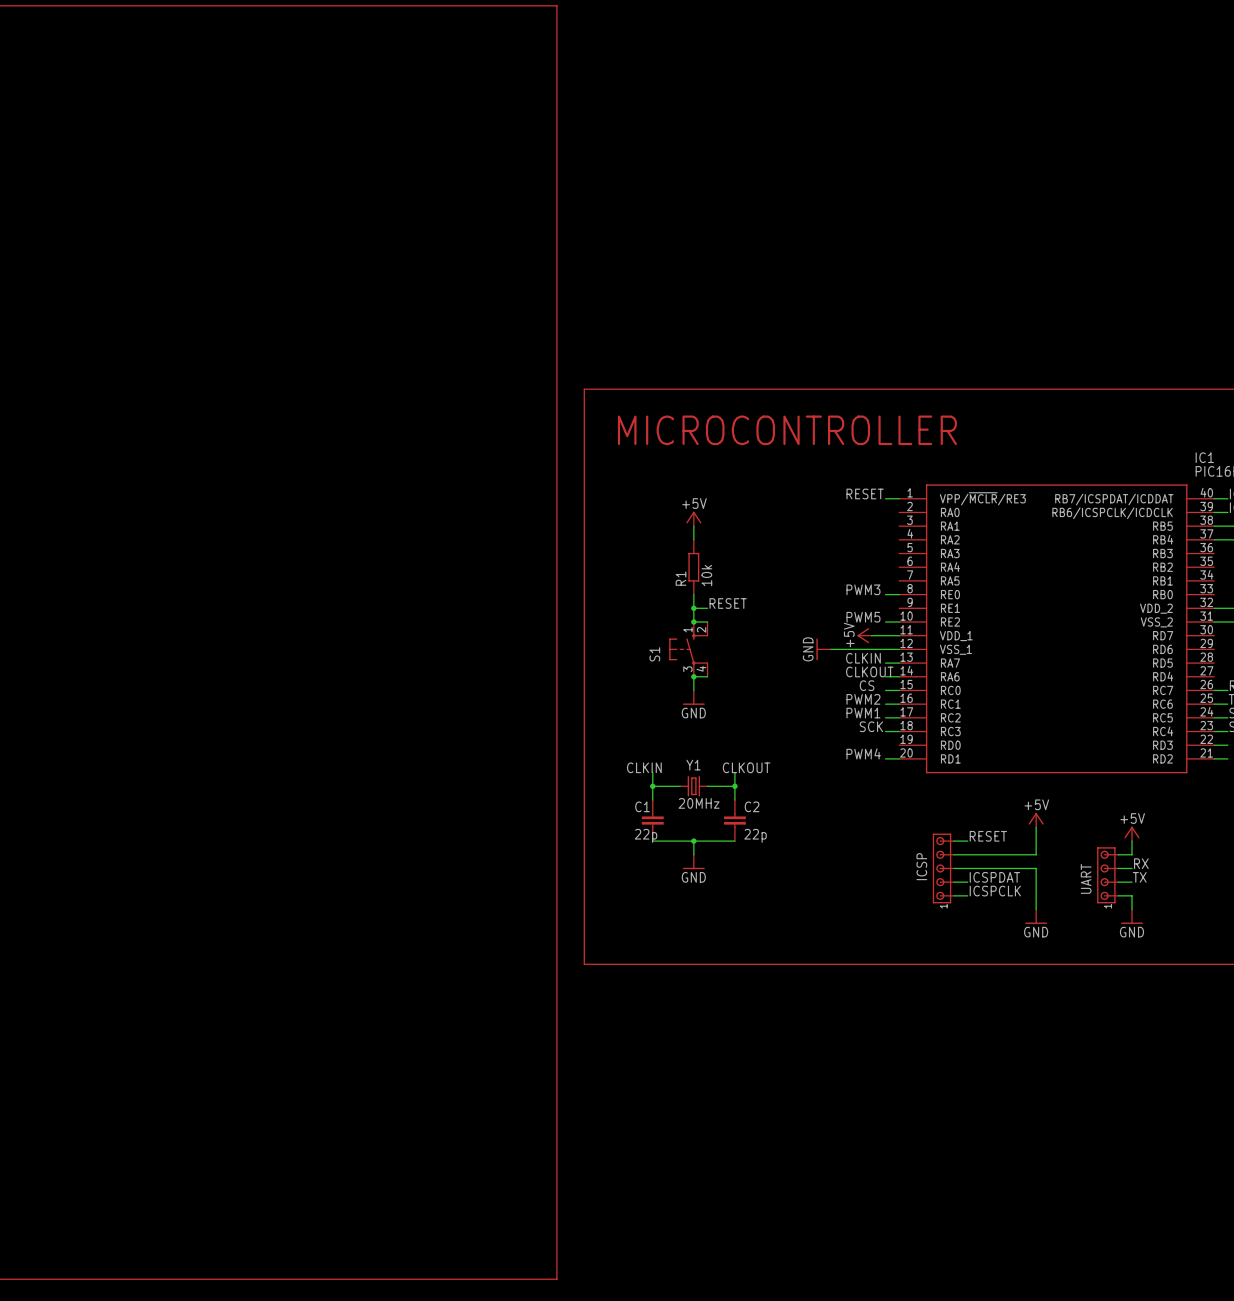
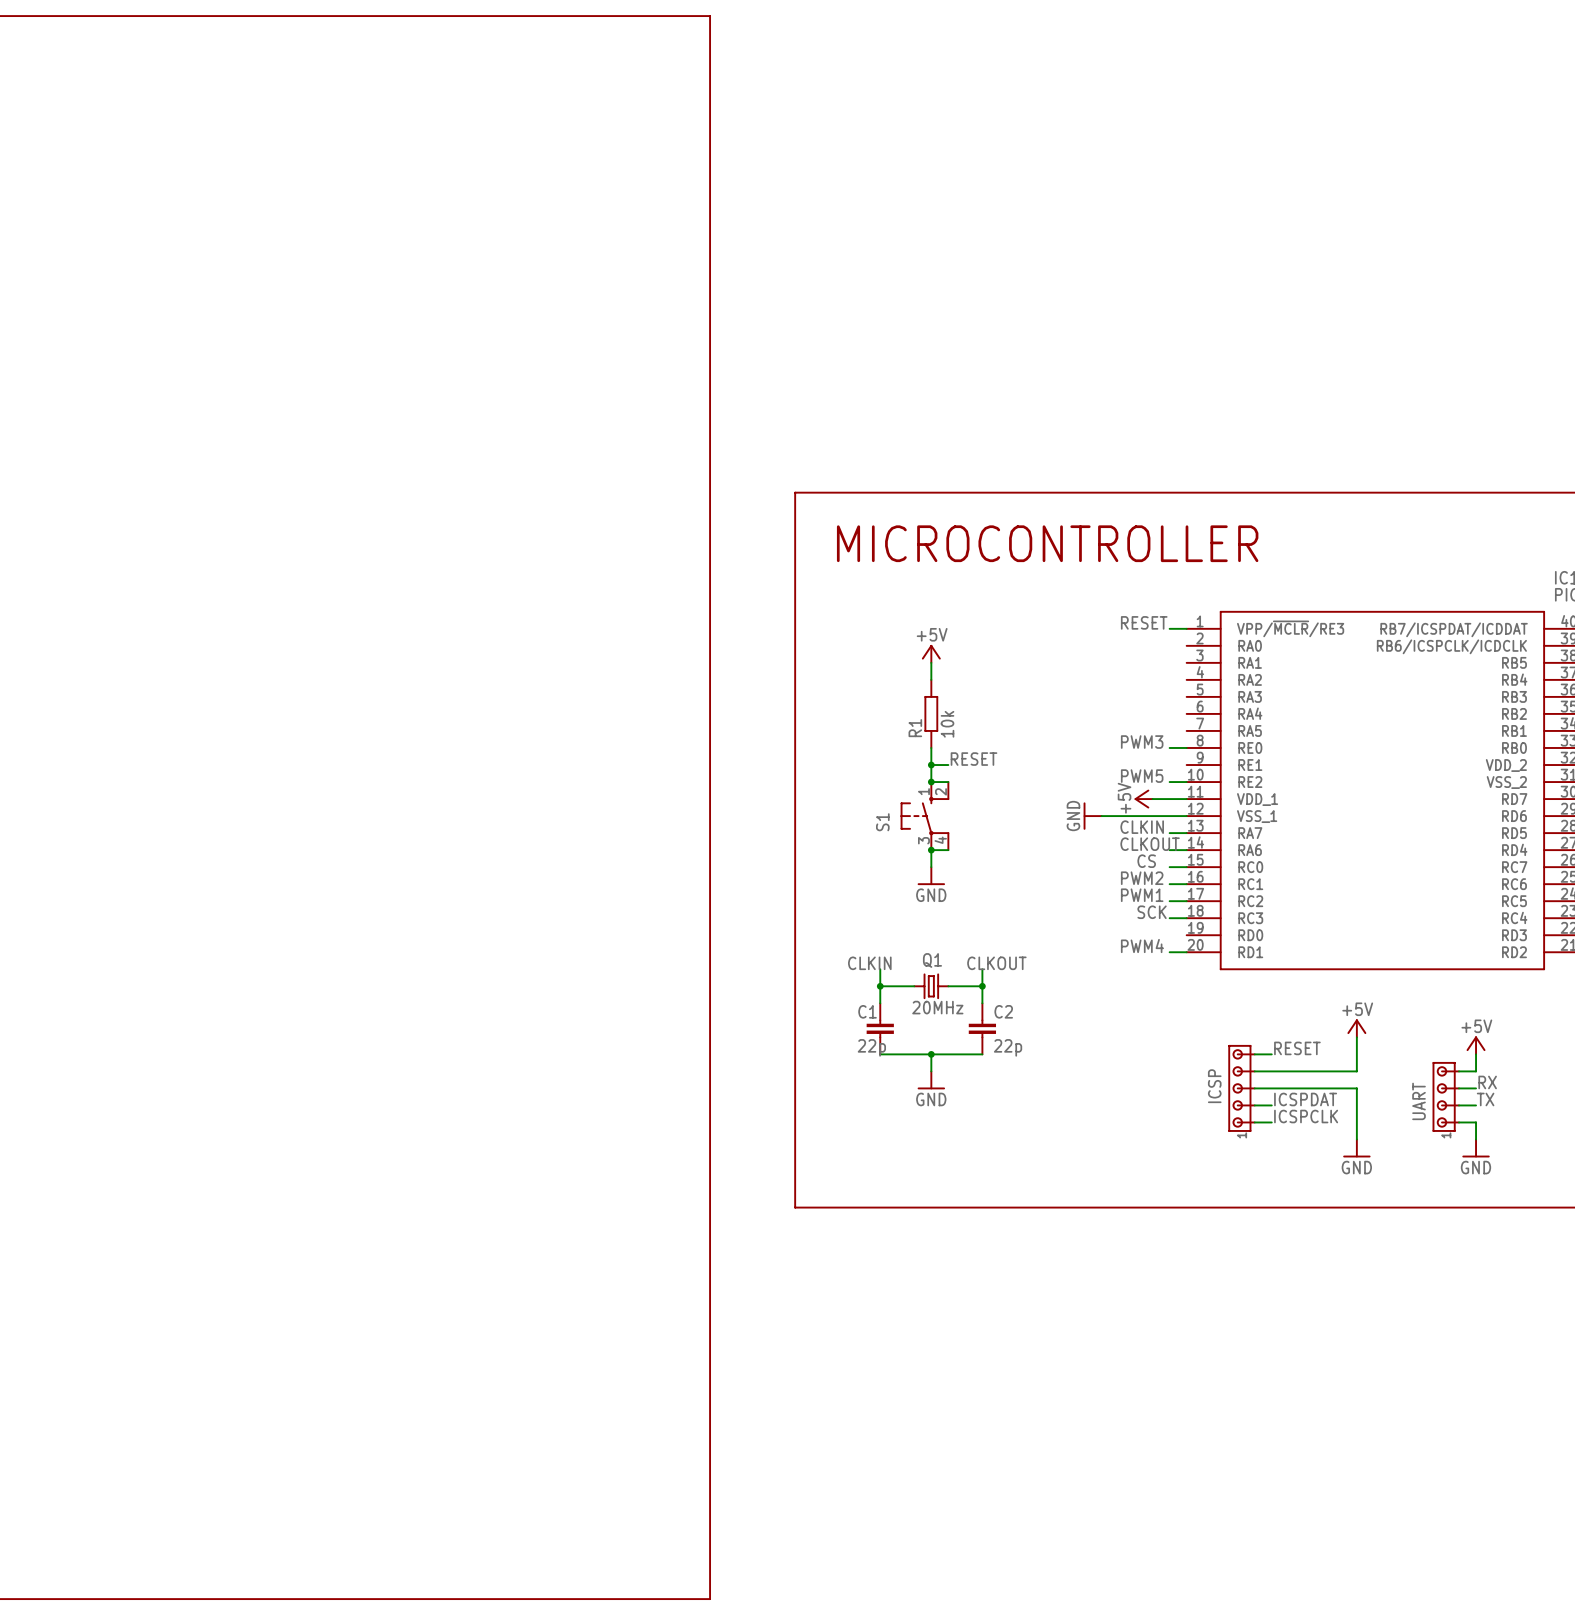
line: (515, 5) (556, 5) (556, 1279) (515, 1279) -> (710, 16) (710, 1599)
Y1 name: Y1 (693, 765) -> Q1 (932, 960)

